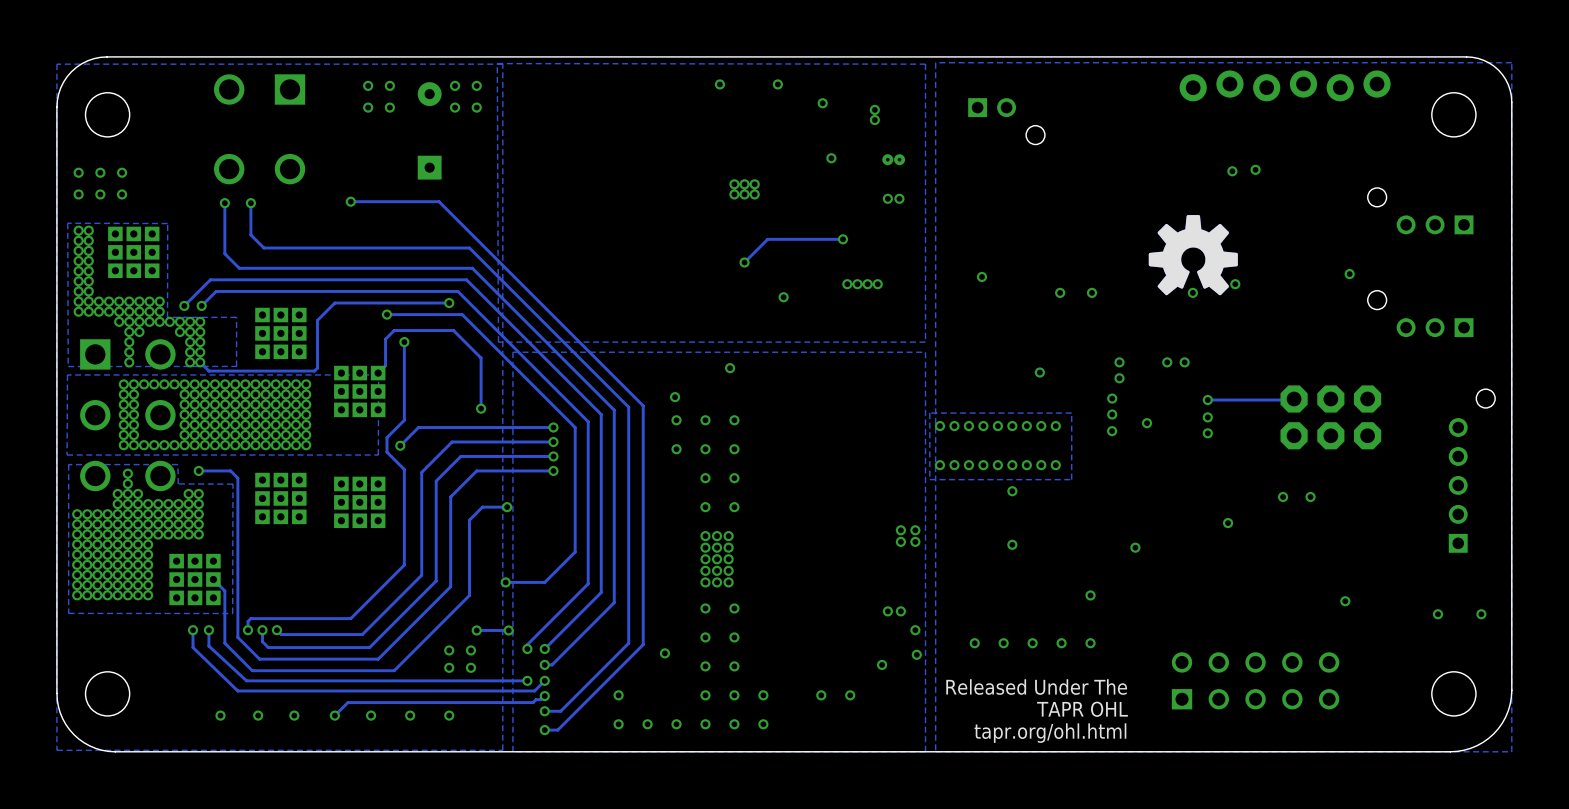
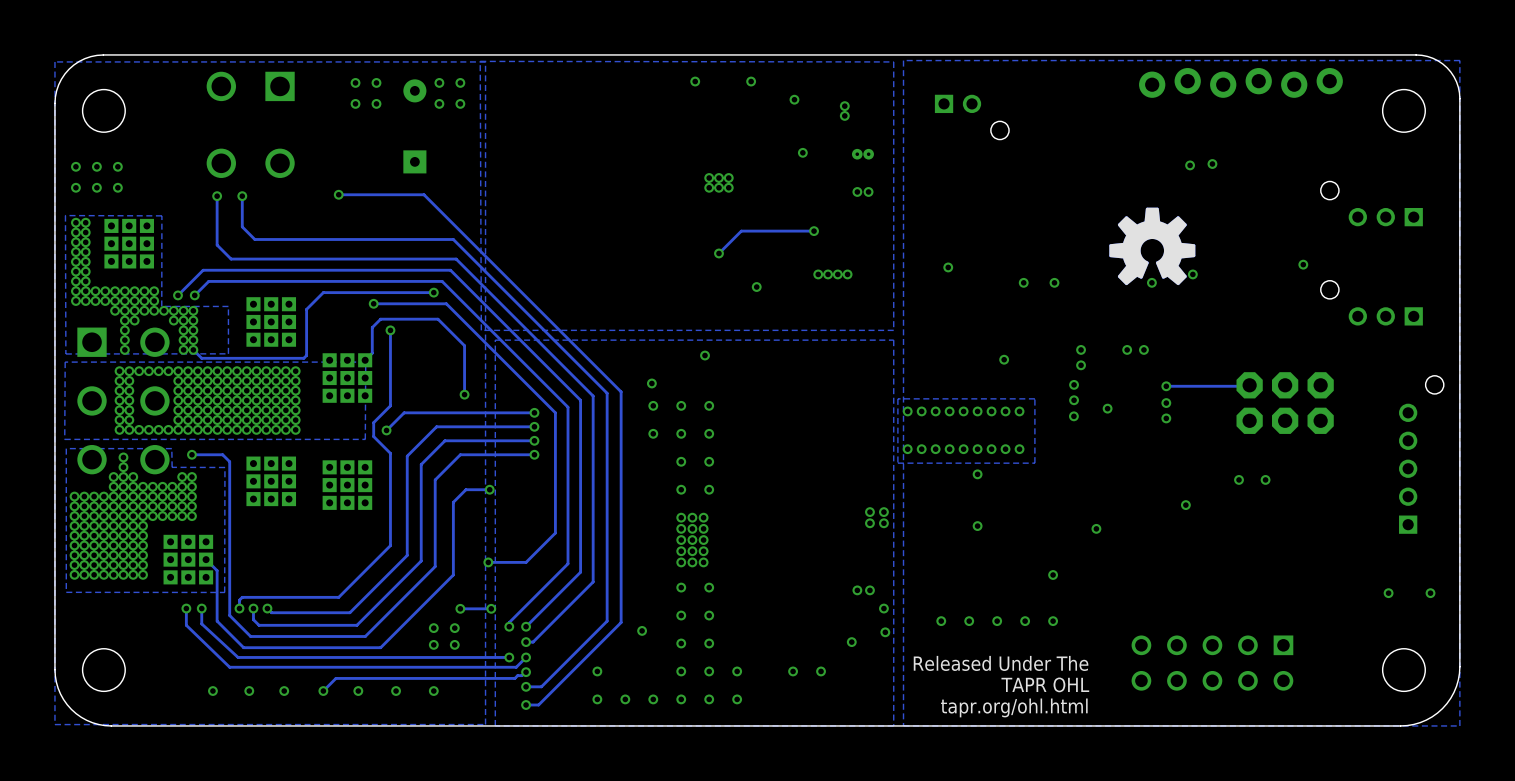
via: (1345, 601) -> none
part rotation: 0° (1255, 680) -> 180° (1212, 663)

